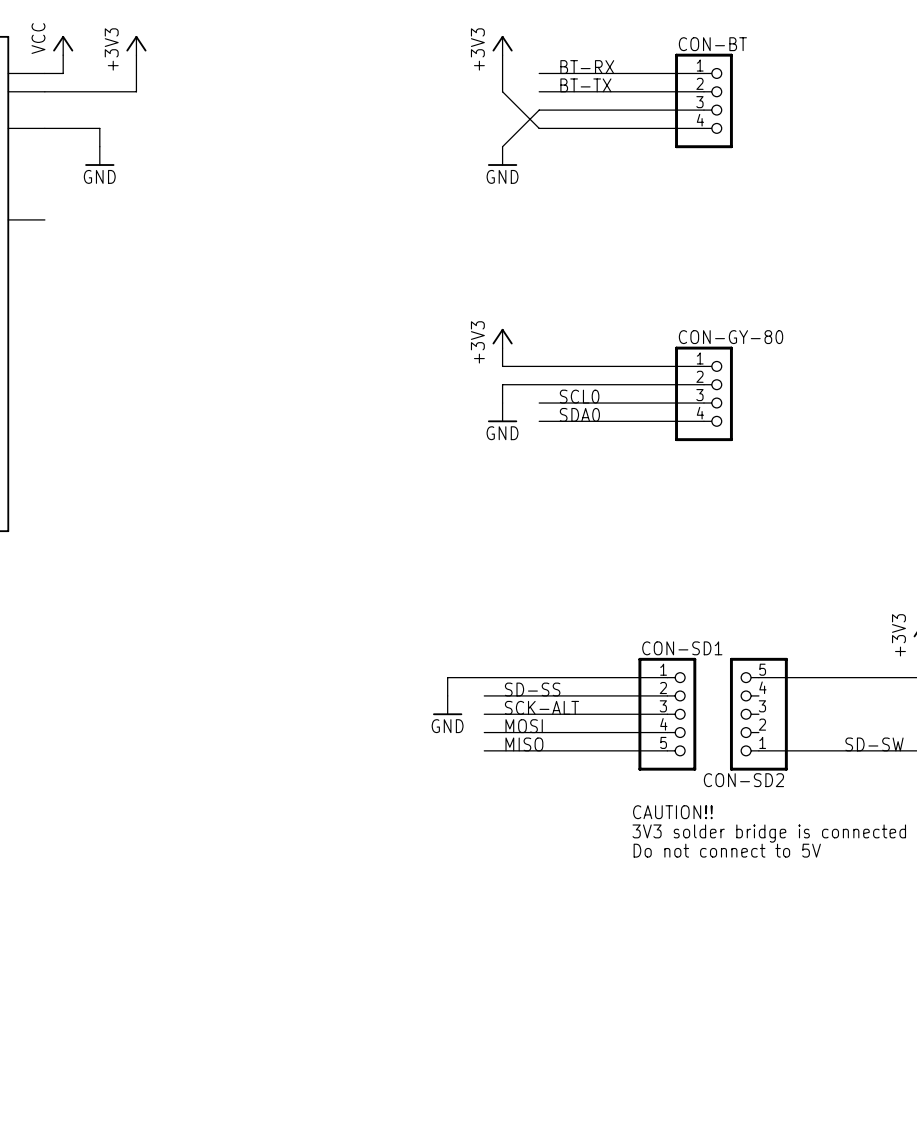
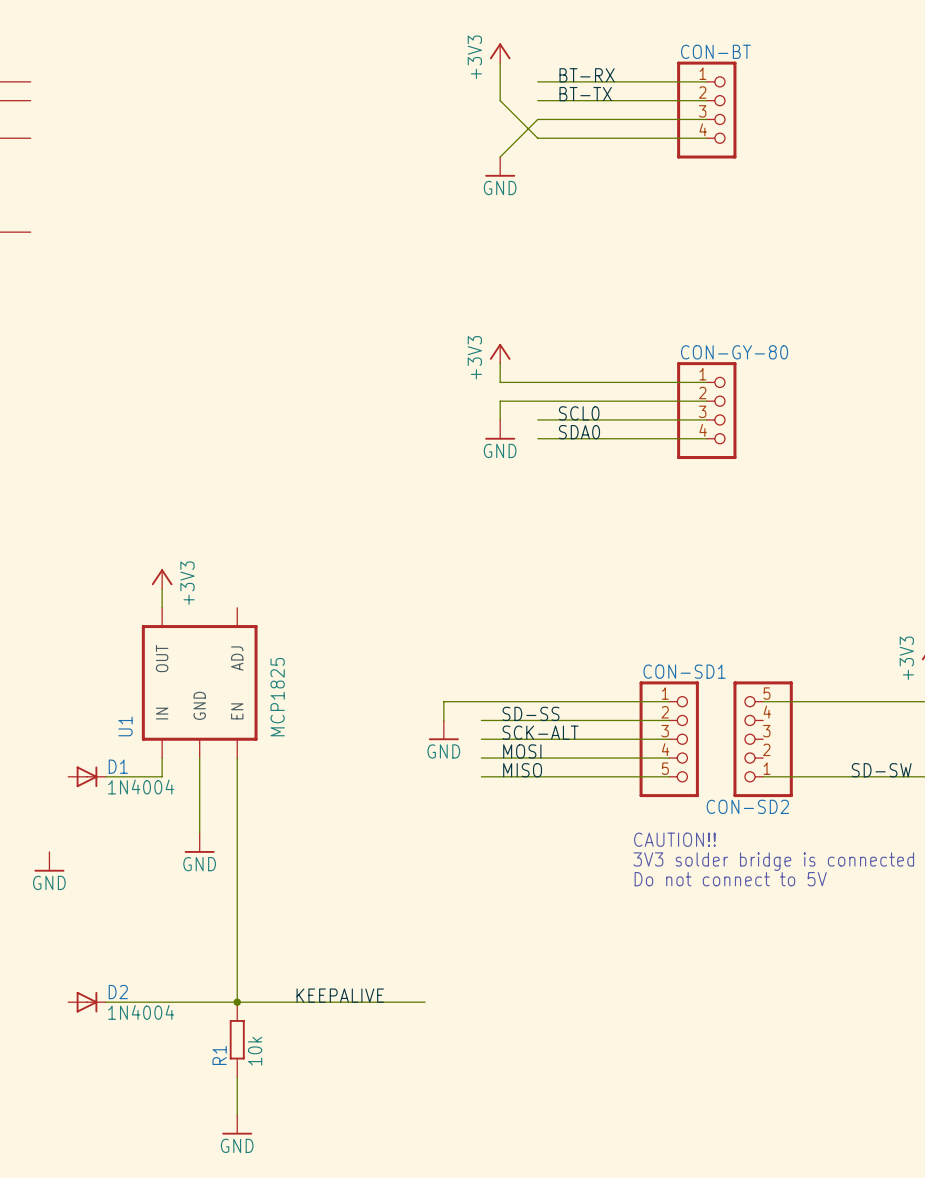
power symbol: VCC (63, 45) -> none
power symbol: +3V3 (136, 45) -> none
wire: (63, 55) (63, 73) (44, 73) -> none
wire: (136, 55) (136, 91) (44, 91) -> none
wire: (44, 128) (99, 128) (99, 146) -> none
power symbol: GND (99, 156) -> none
power symbol: none -> +3V3 (162, 579)
wire: none -> (162, 588) (162, 607)
U1: none -> MCP1825 (199, 682)
wire: none -> (162, 758) (162, 776) (105, 776)
wire: none -> (199, 758) (199, 833)
wire: none -> (237, 758) (237, 1002)
D1: none -> 1N4004 (86, 776)
power symbol: none -> GND (199, 843)
power symbol: none -> GND (49, 861)
label: none -> KEEPALIVE (340, 995)
D2: none -> 1N4004 (86, 1002)
wire: none -> (105, 1002) (425, 1002)
junction: none -> (237, 1002)
R1: none -> 10k (237, 1039)
wire: none -> (237, 1077) (237, 1114)
power symbol: none -> GND (237, 1124)

